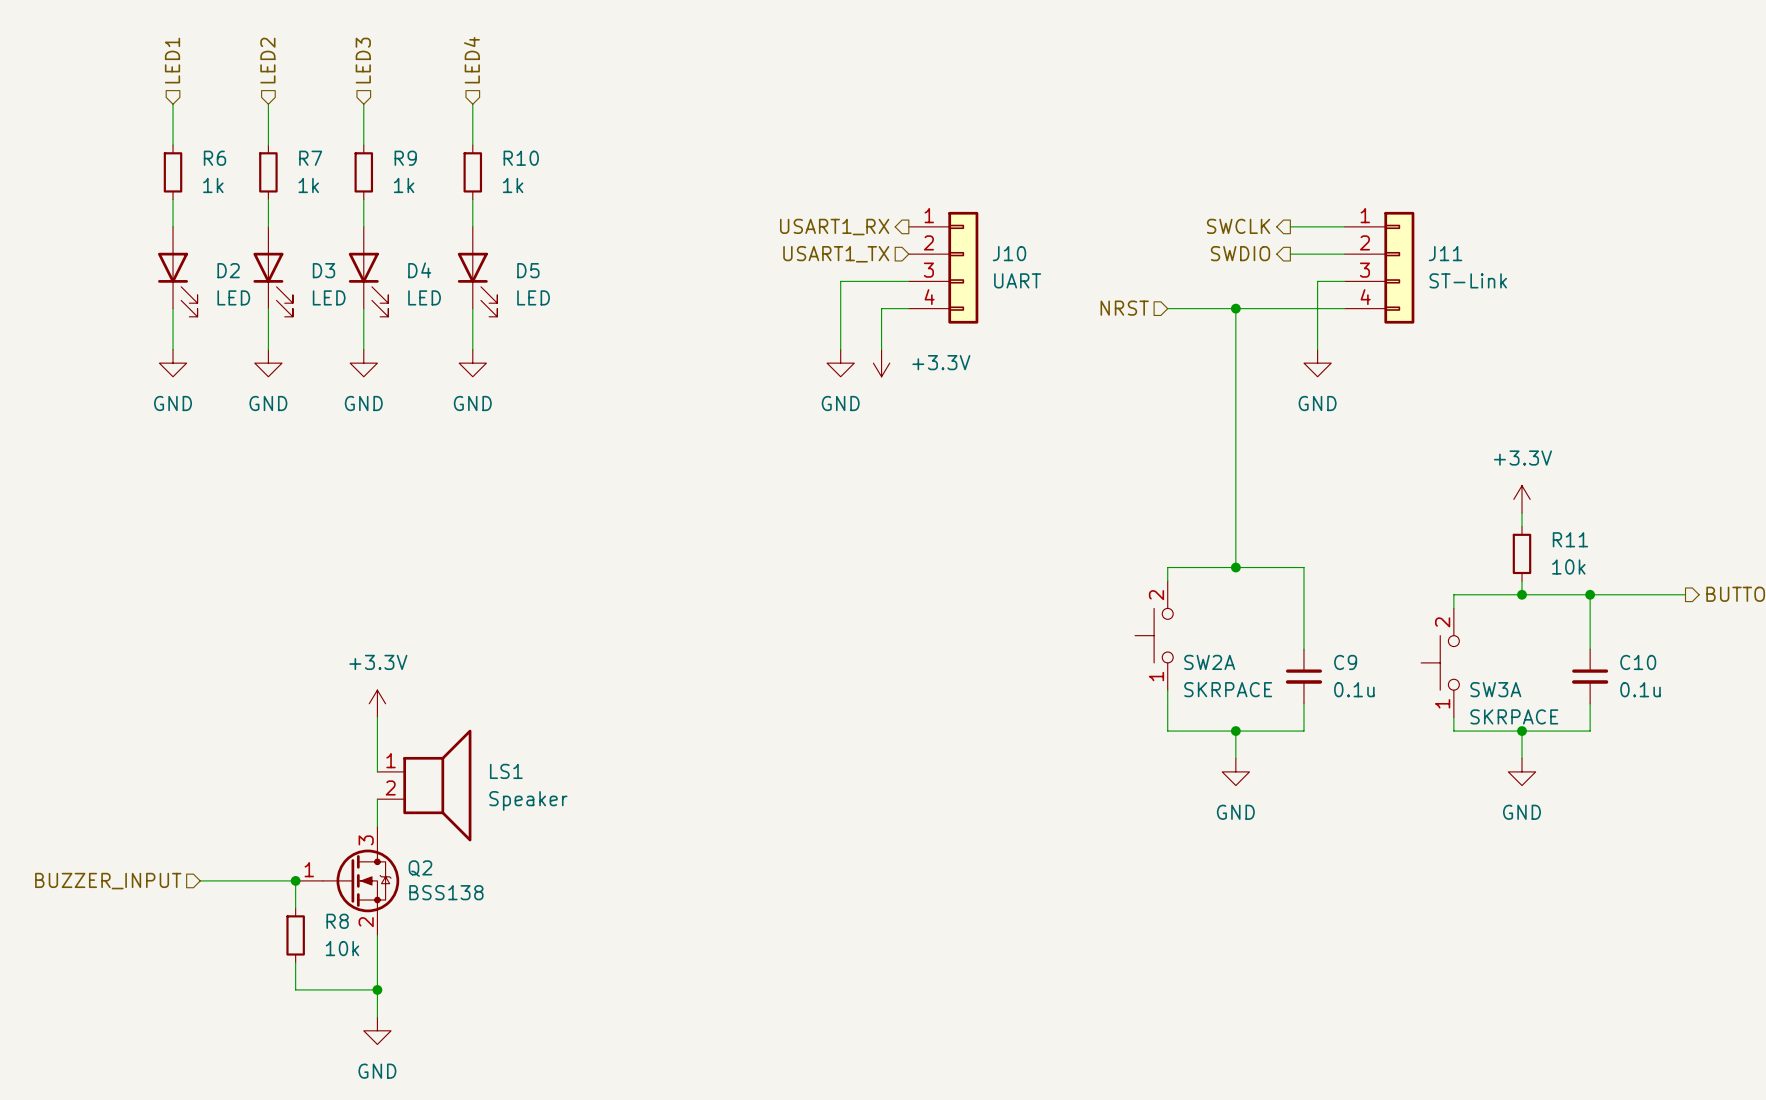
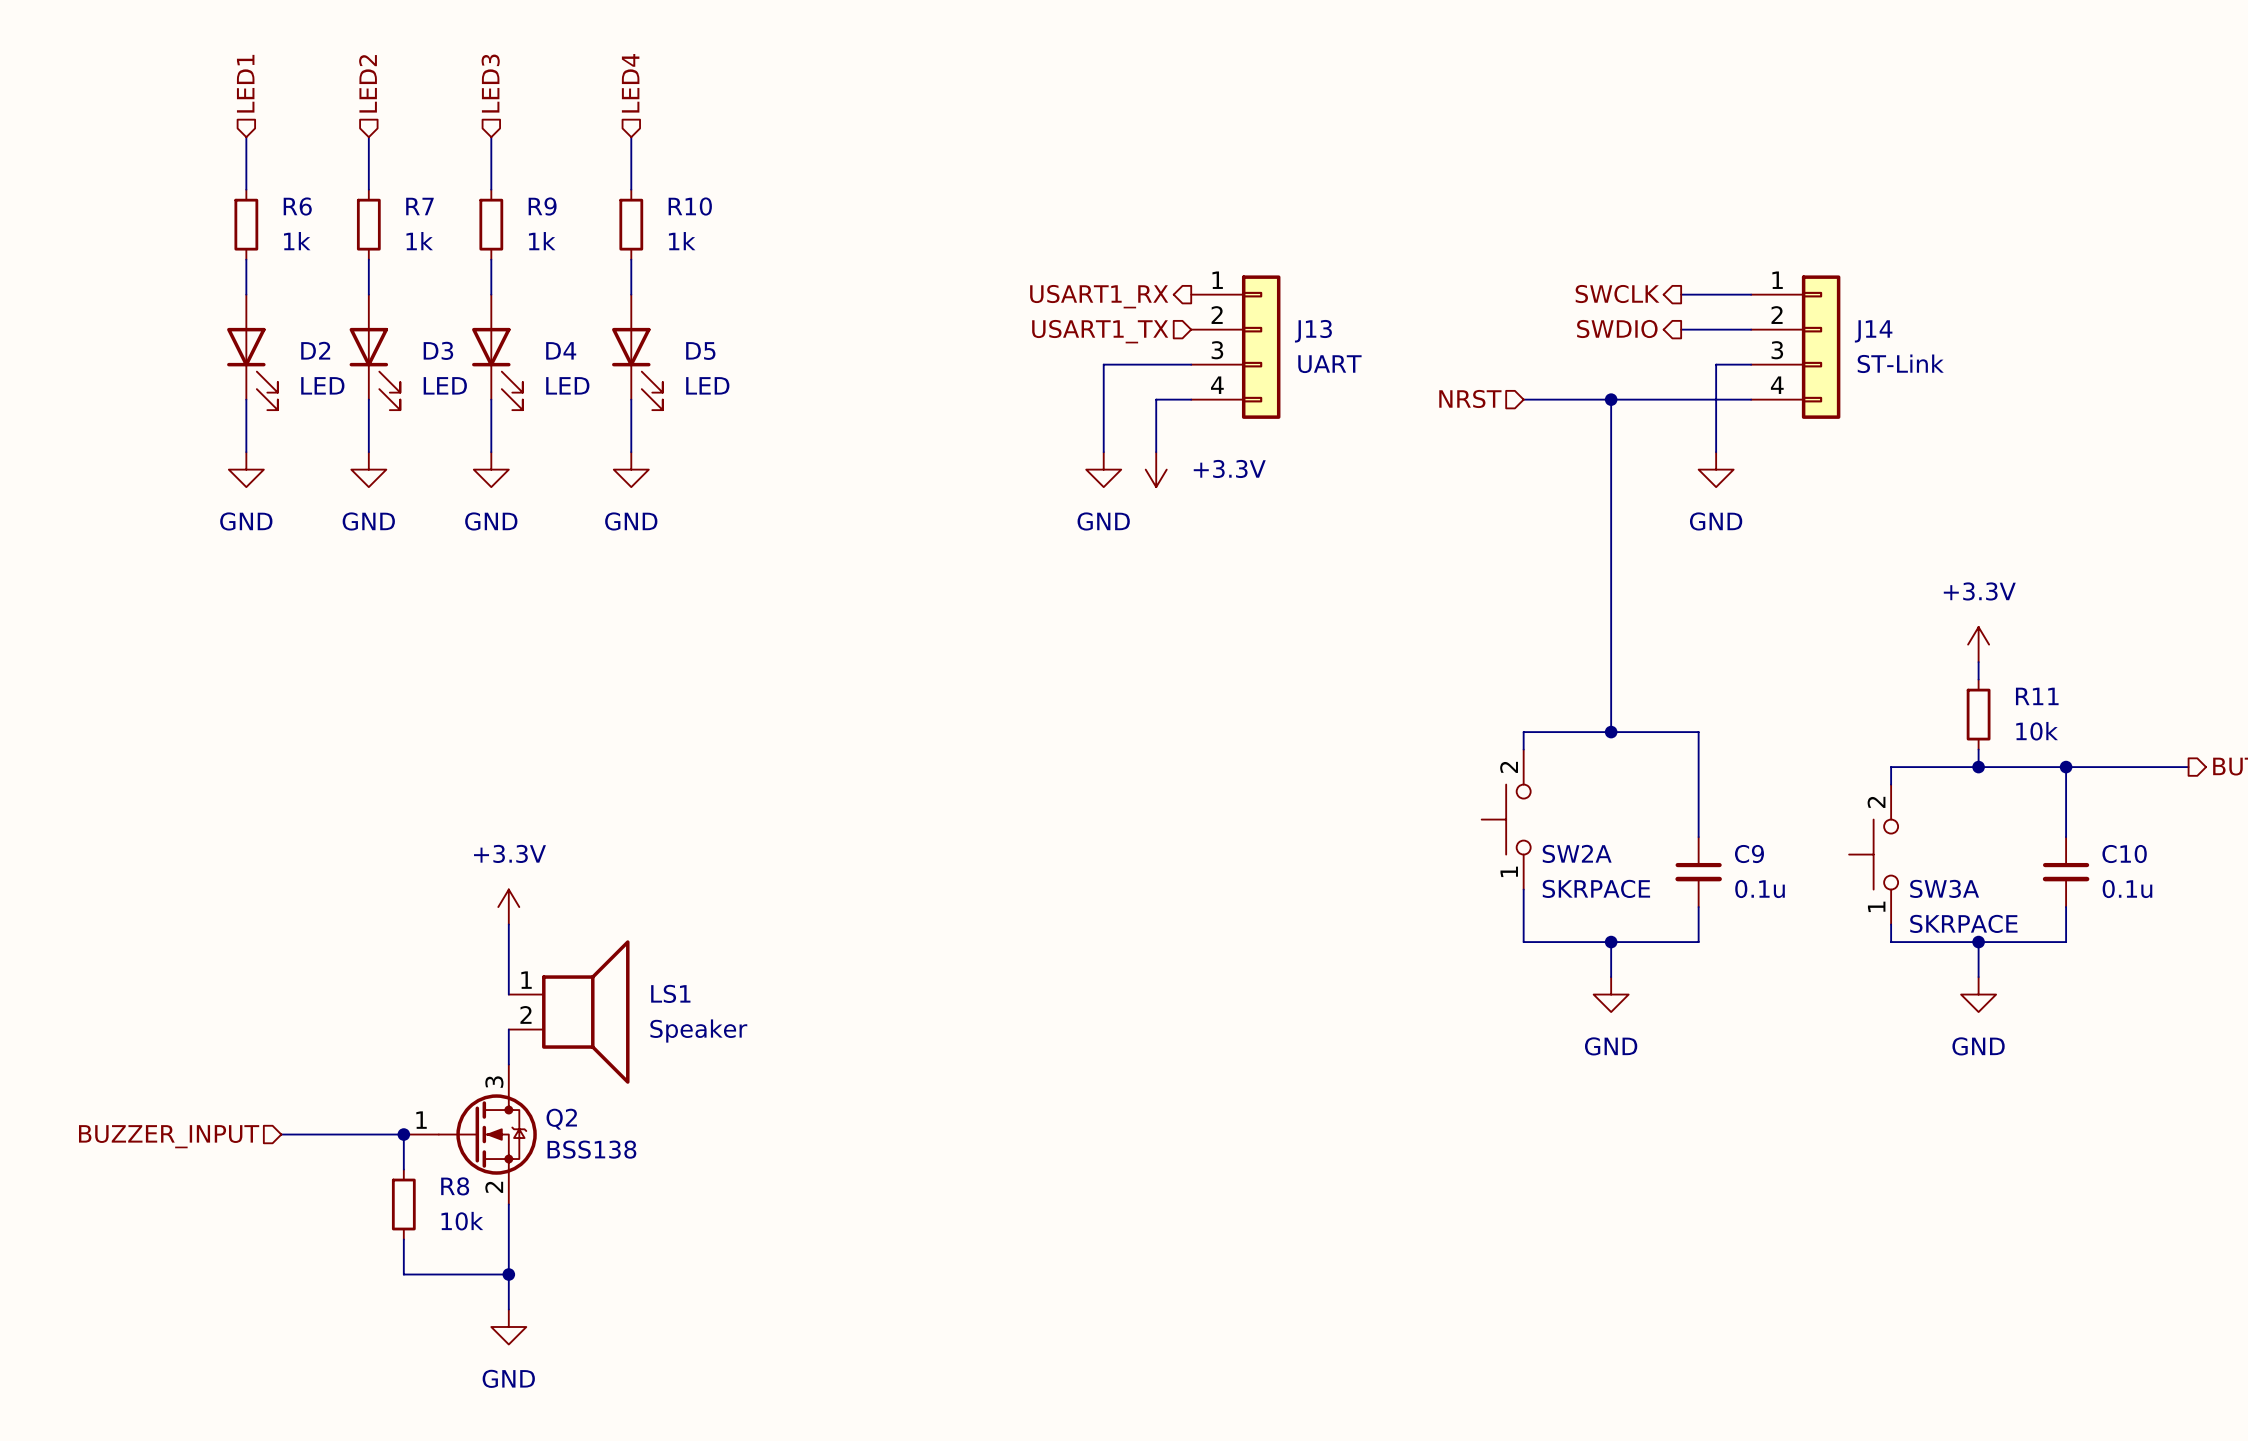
J10 name: J10 (1009, 253) -> J13 (1313, 331)
J11 name: J11 (1445, 253) -> J14 (1873, 331)

